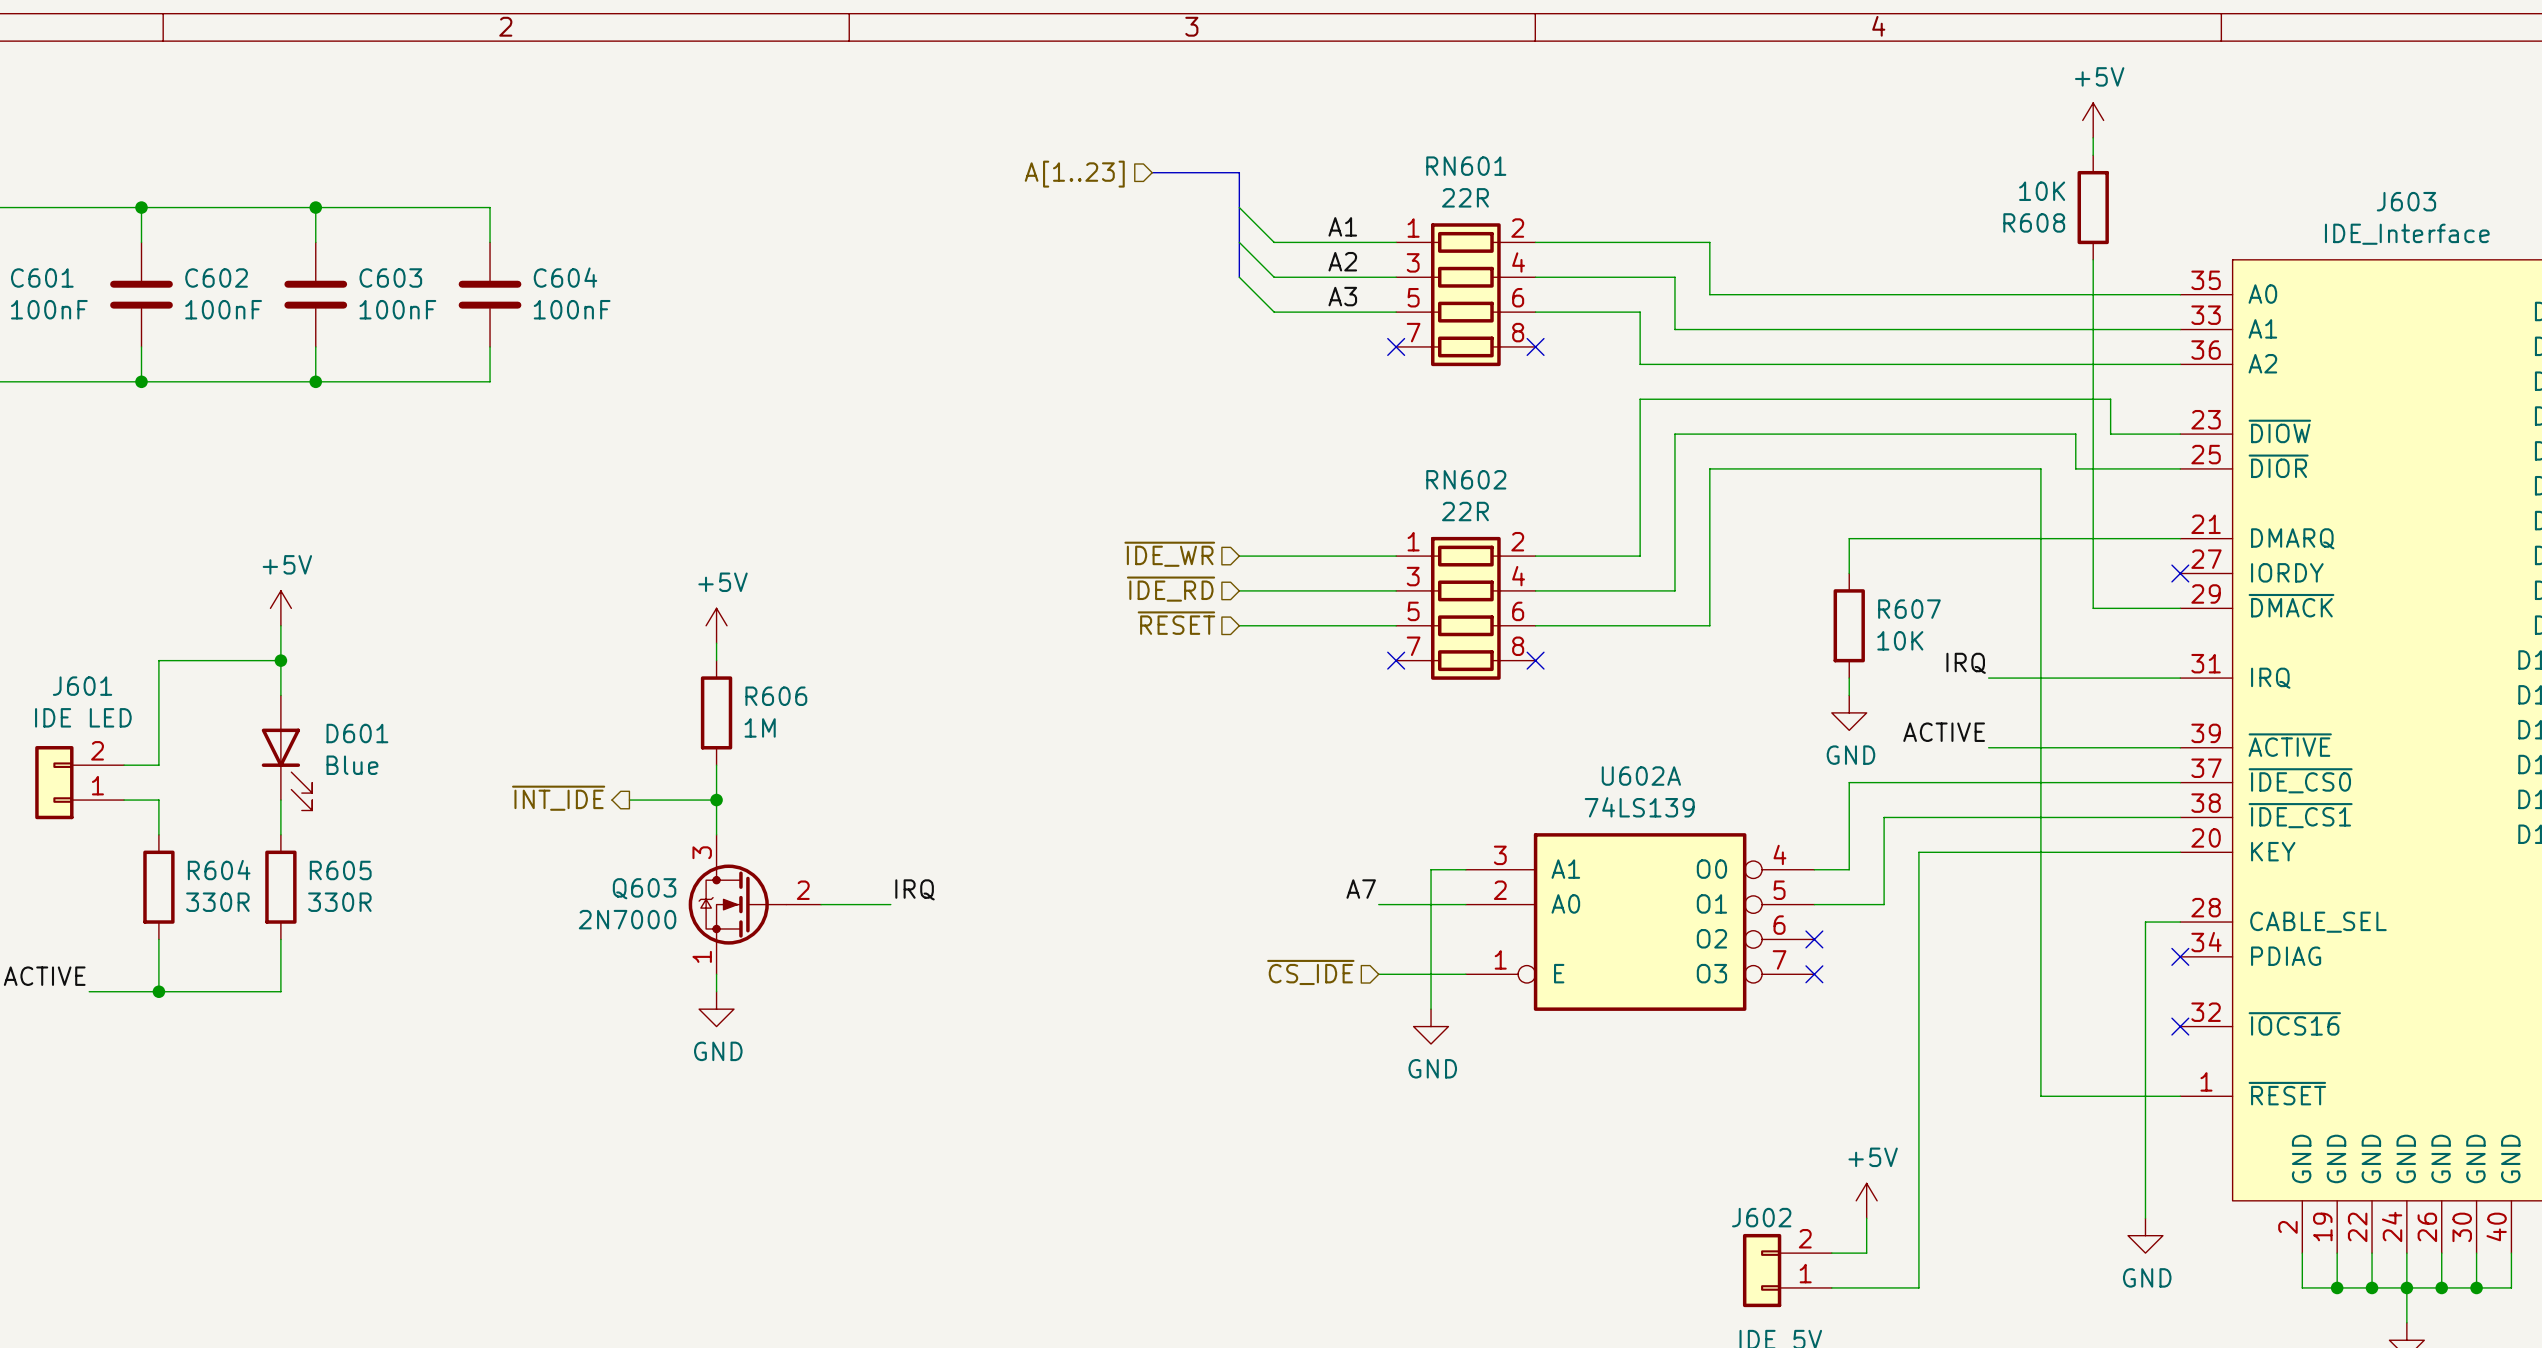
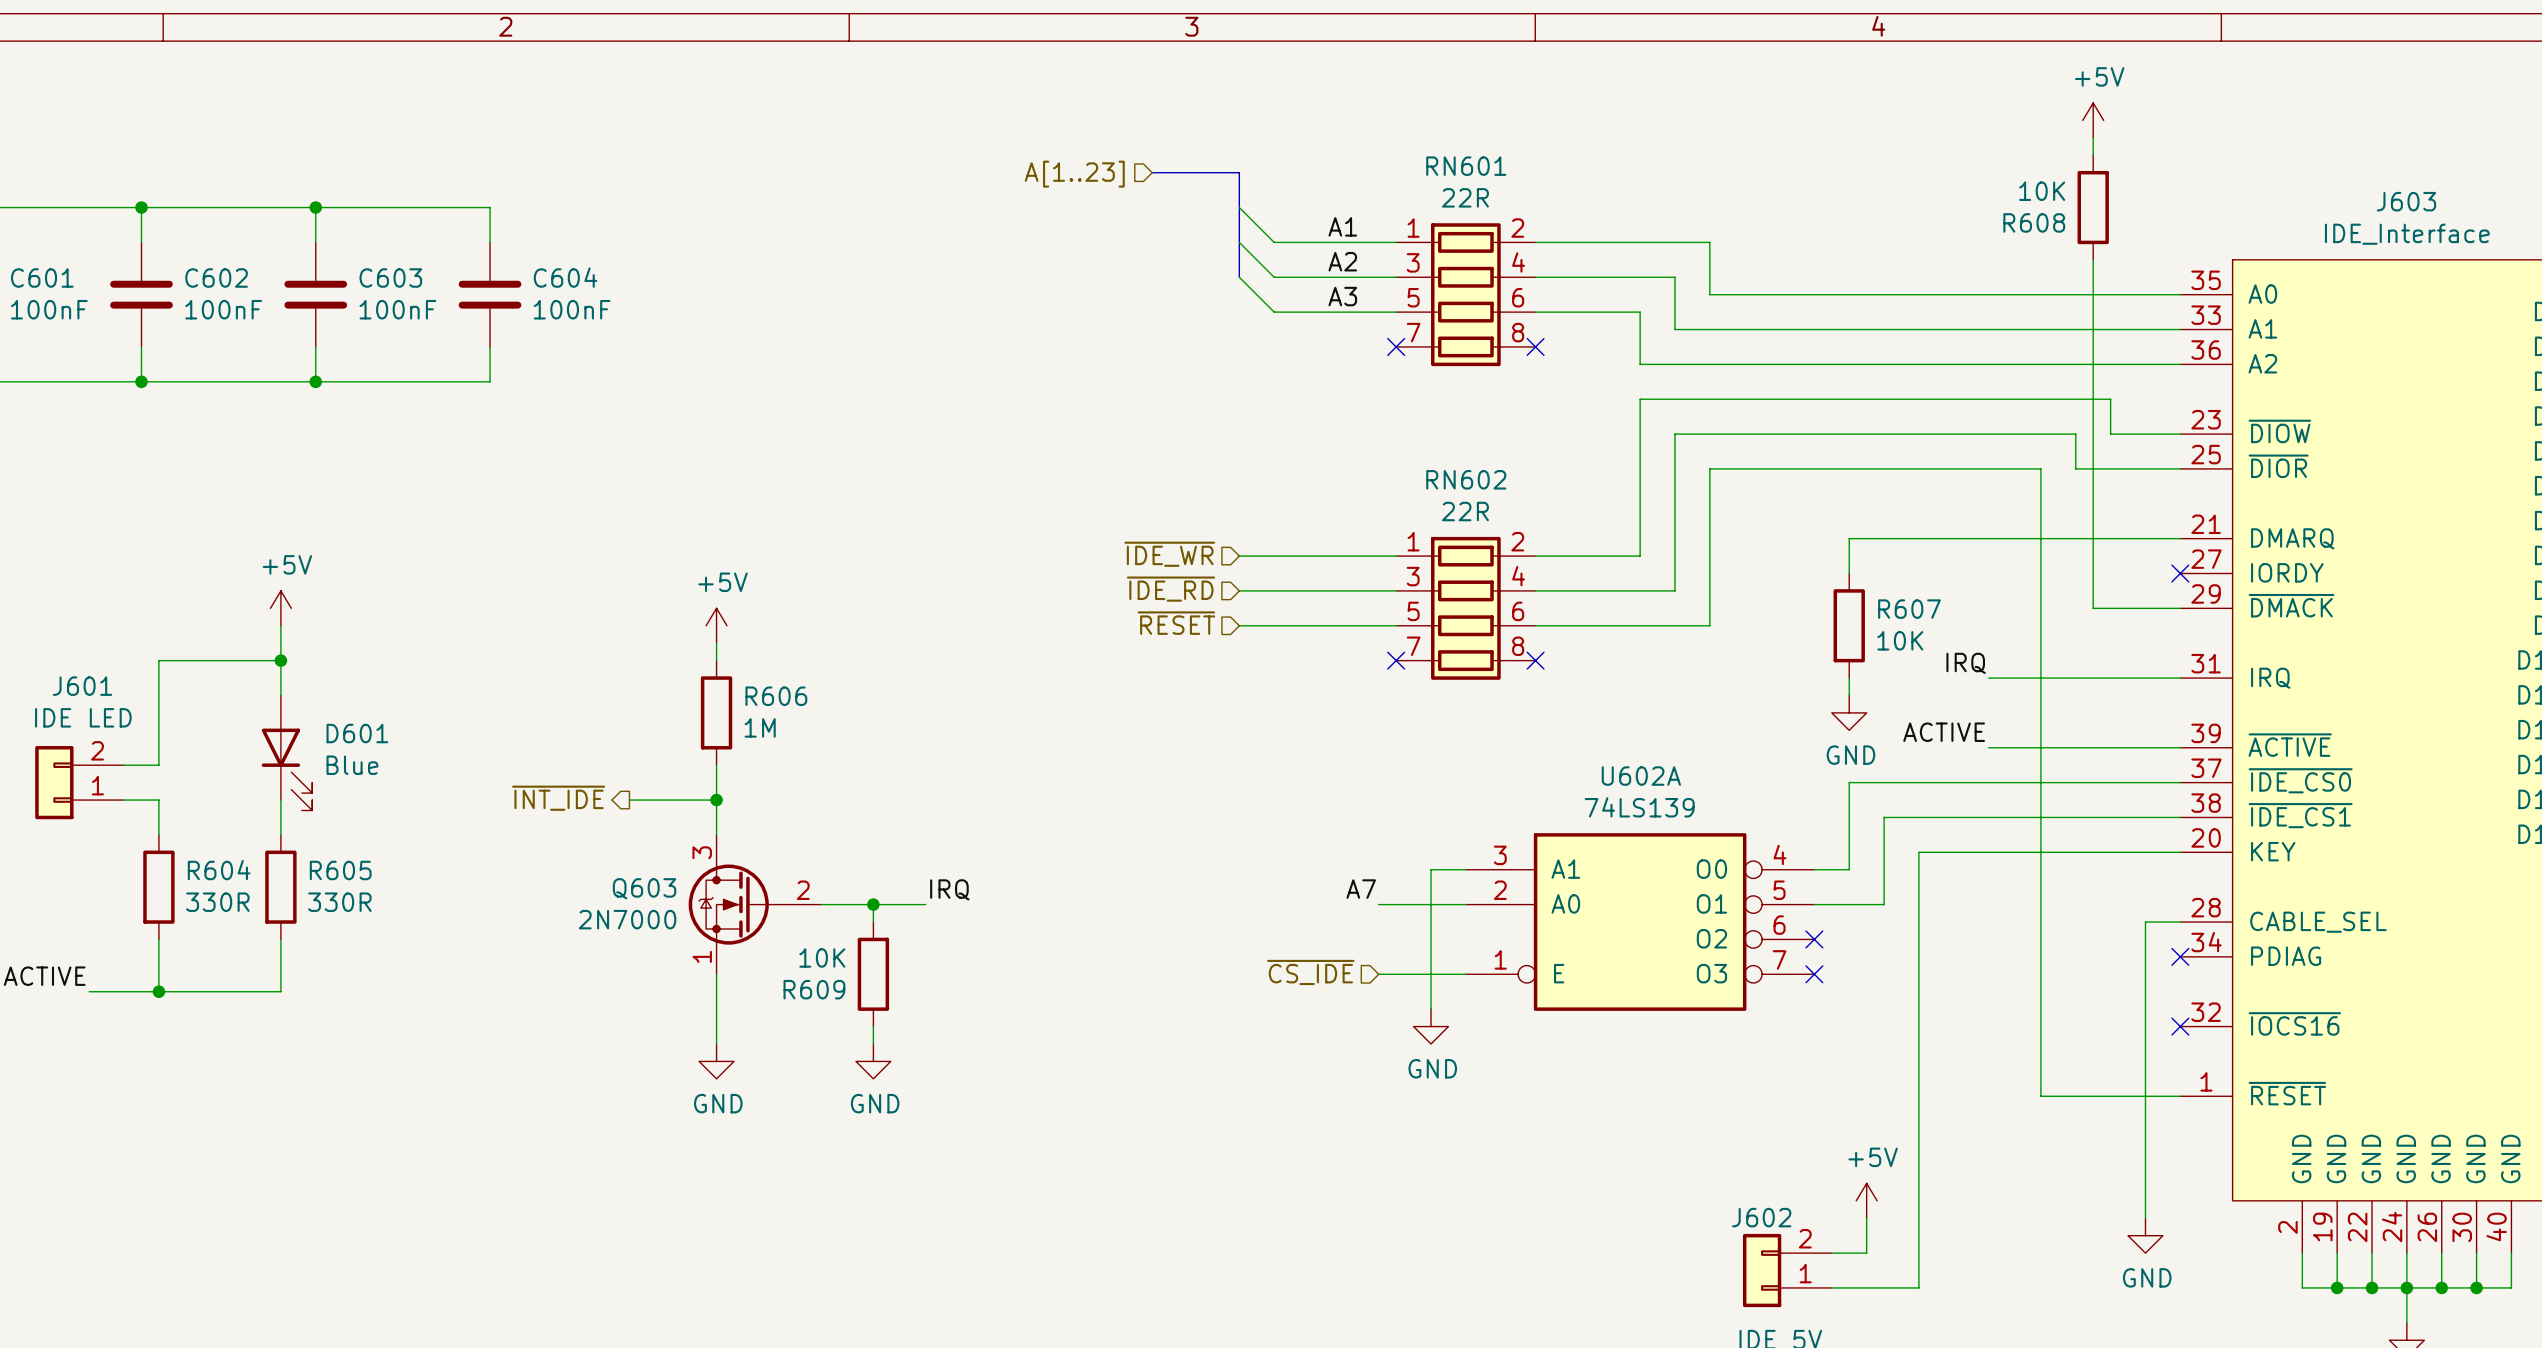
label position: IRQ (915, 889) -> IRQ (949, 889)
wire: none -> (873, 904) (873, 922)
junction: none -> (873, 904)
wire: none -> (890, 904) (925, 904)
R609: none -> 10K (873, 974)
wire: none -> (716, 991) (716, 1044)
power symbol position: GND (716, 1009) -> GND (716, 1061)
wire: none -> (873, 1026) (873, 1044)
power symbol: none -> GND (873, 1061)

